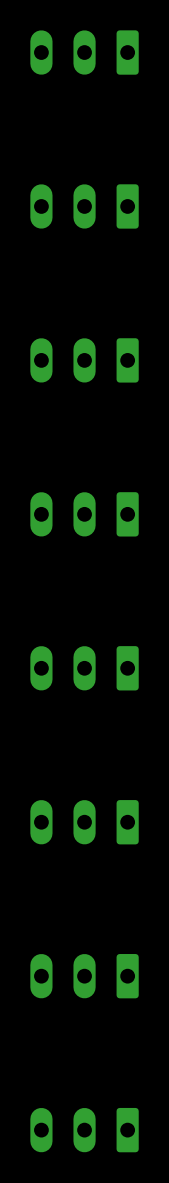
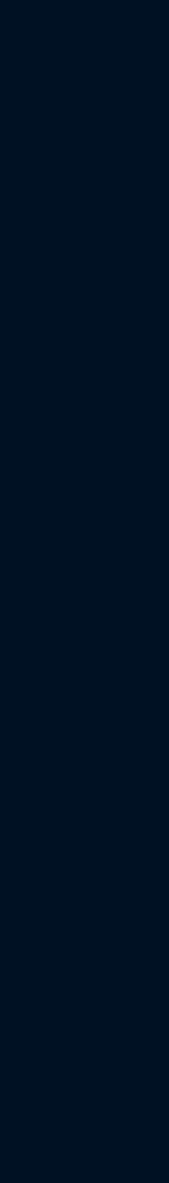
part: (84, 52) -> none
part: (84, 206) -> none
part: (84, 360) -> none
part: (84, 514) -> none
part: (84, 668) -> none
part: (84, 822) -> none
part: (84, 976) -> none
part: (84, 1130) -> none

